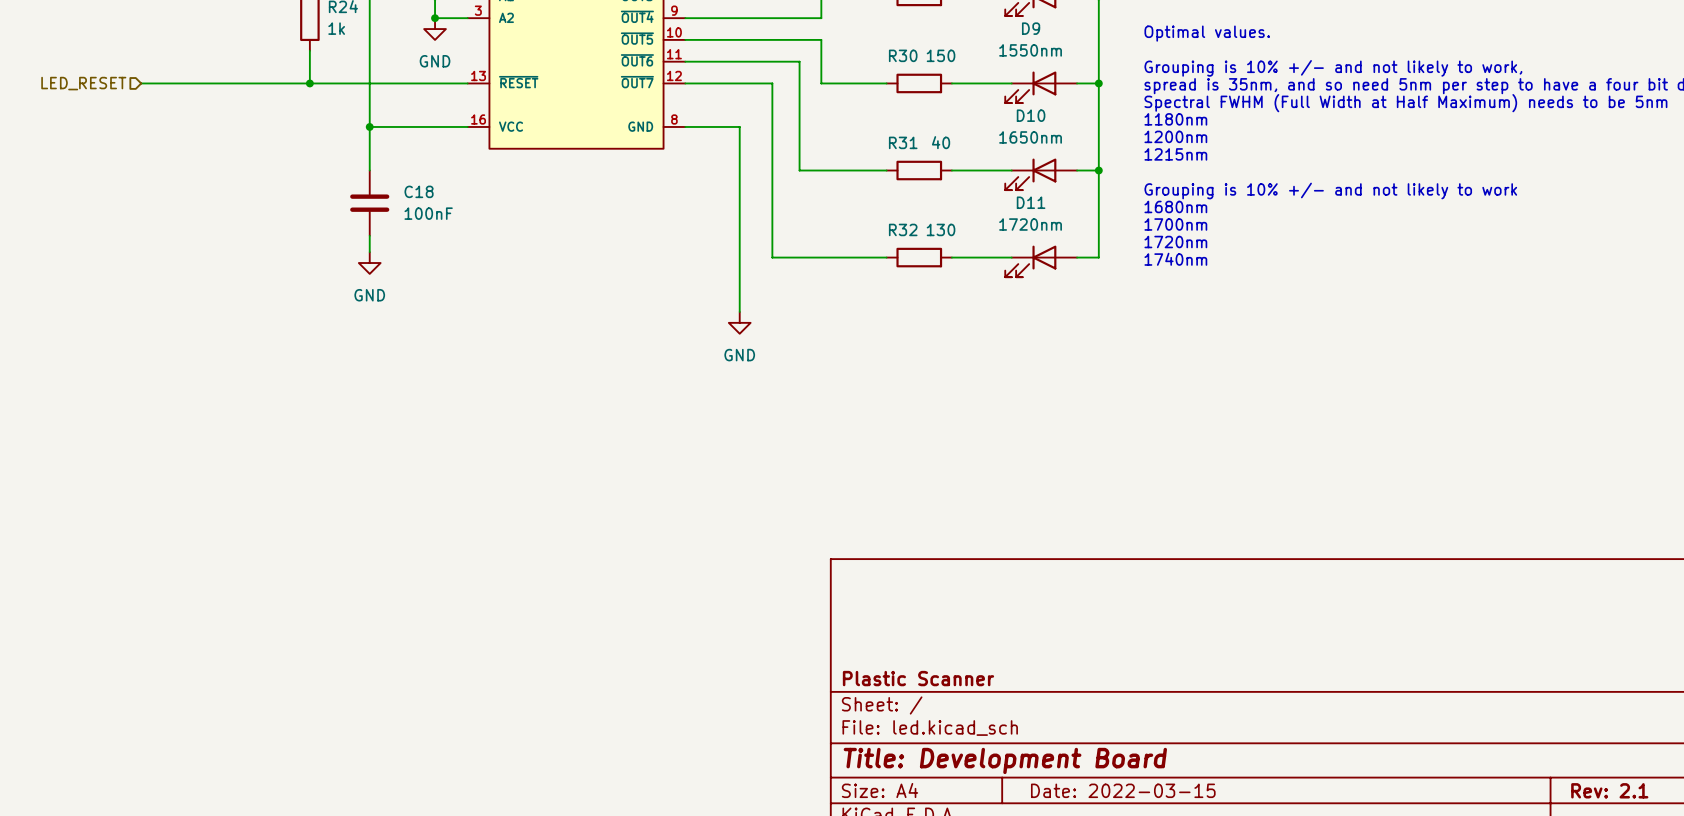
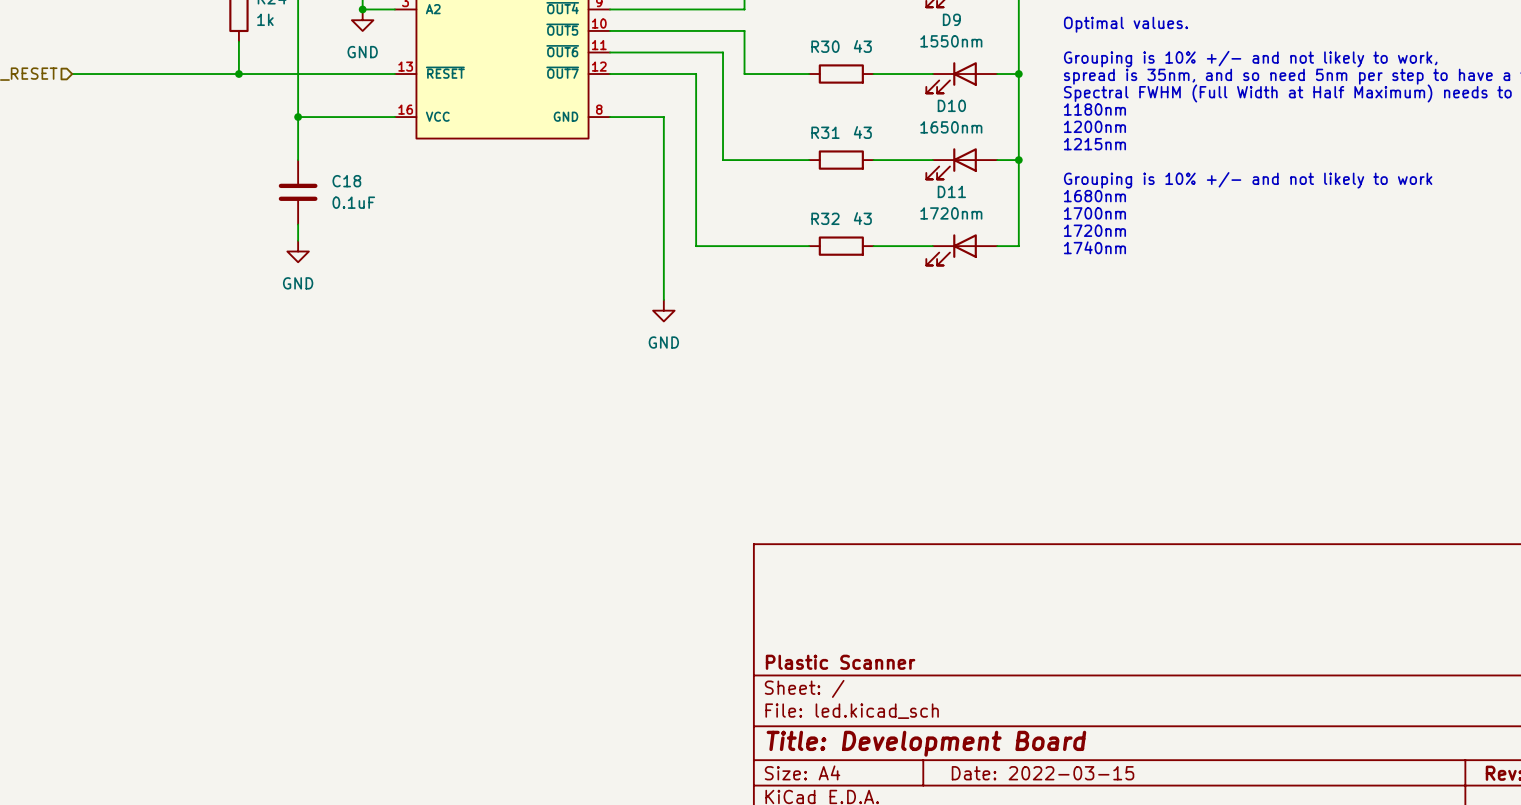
R30 value: 150 (941, 55) -> 43 (862, 46)
R31 value: 40 (941, 142) -> 43 (862, 132)
C18 value: 100nF (428, 213) -> 0.1uF (353, 202)
R32 value: 130 (941, 229) -> 43 (862, 218)

